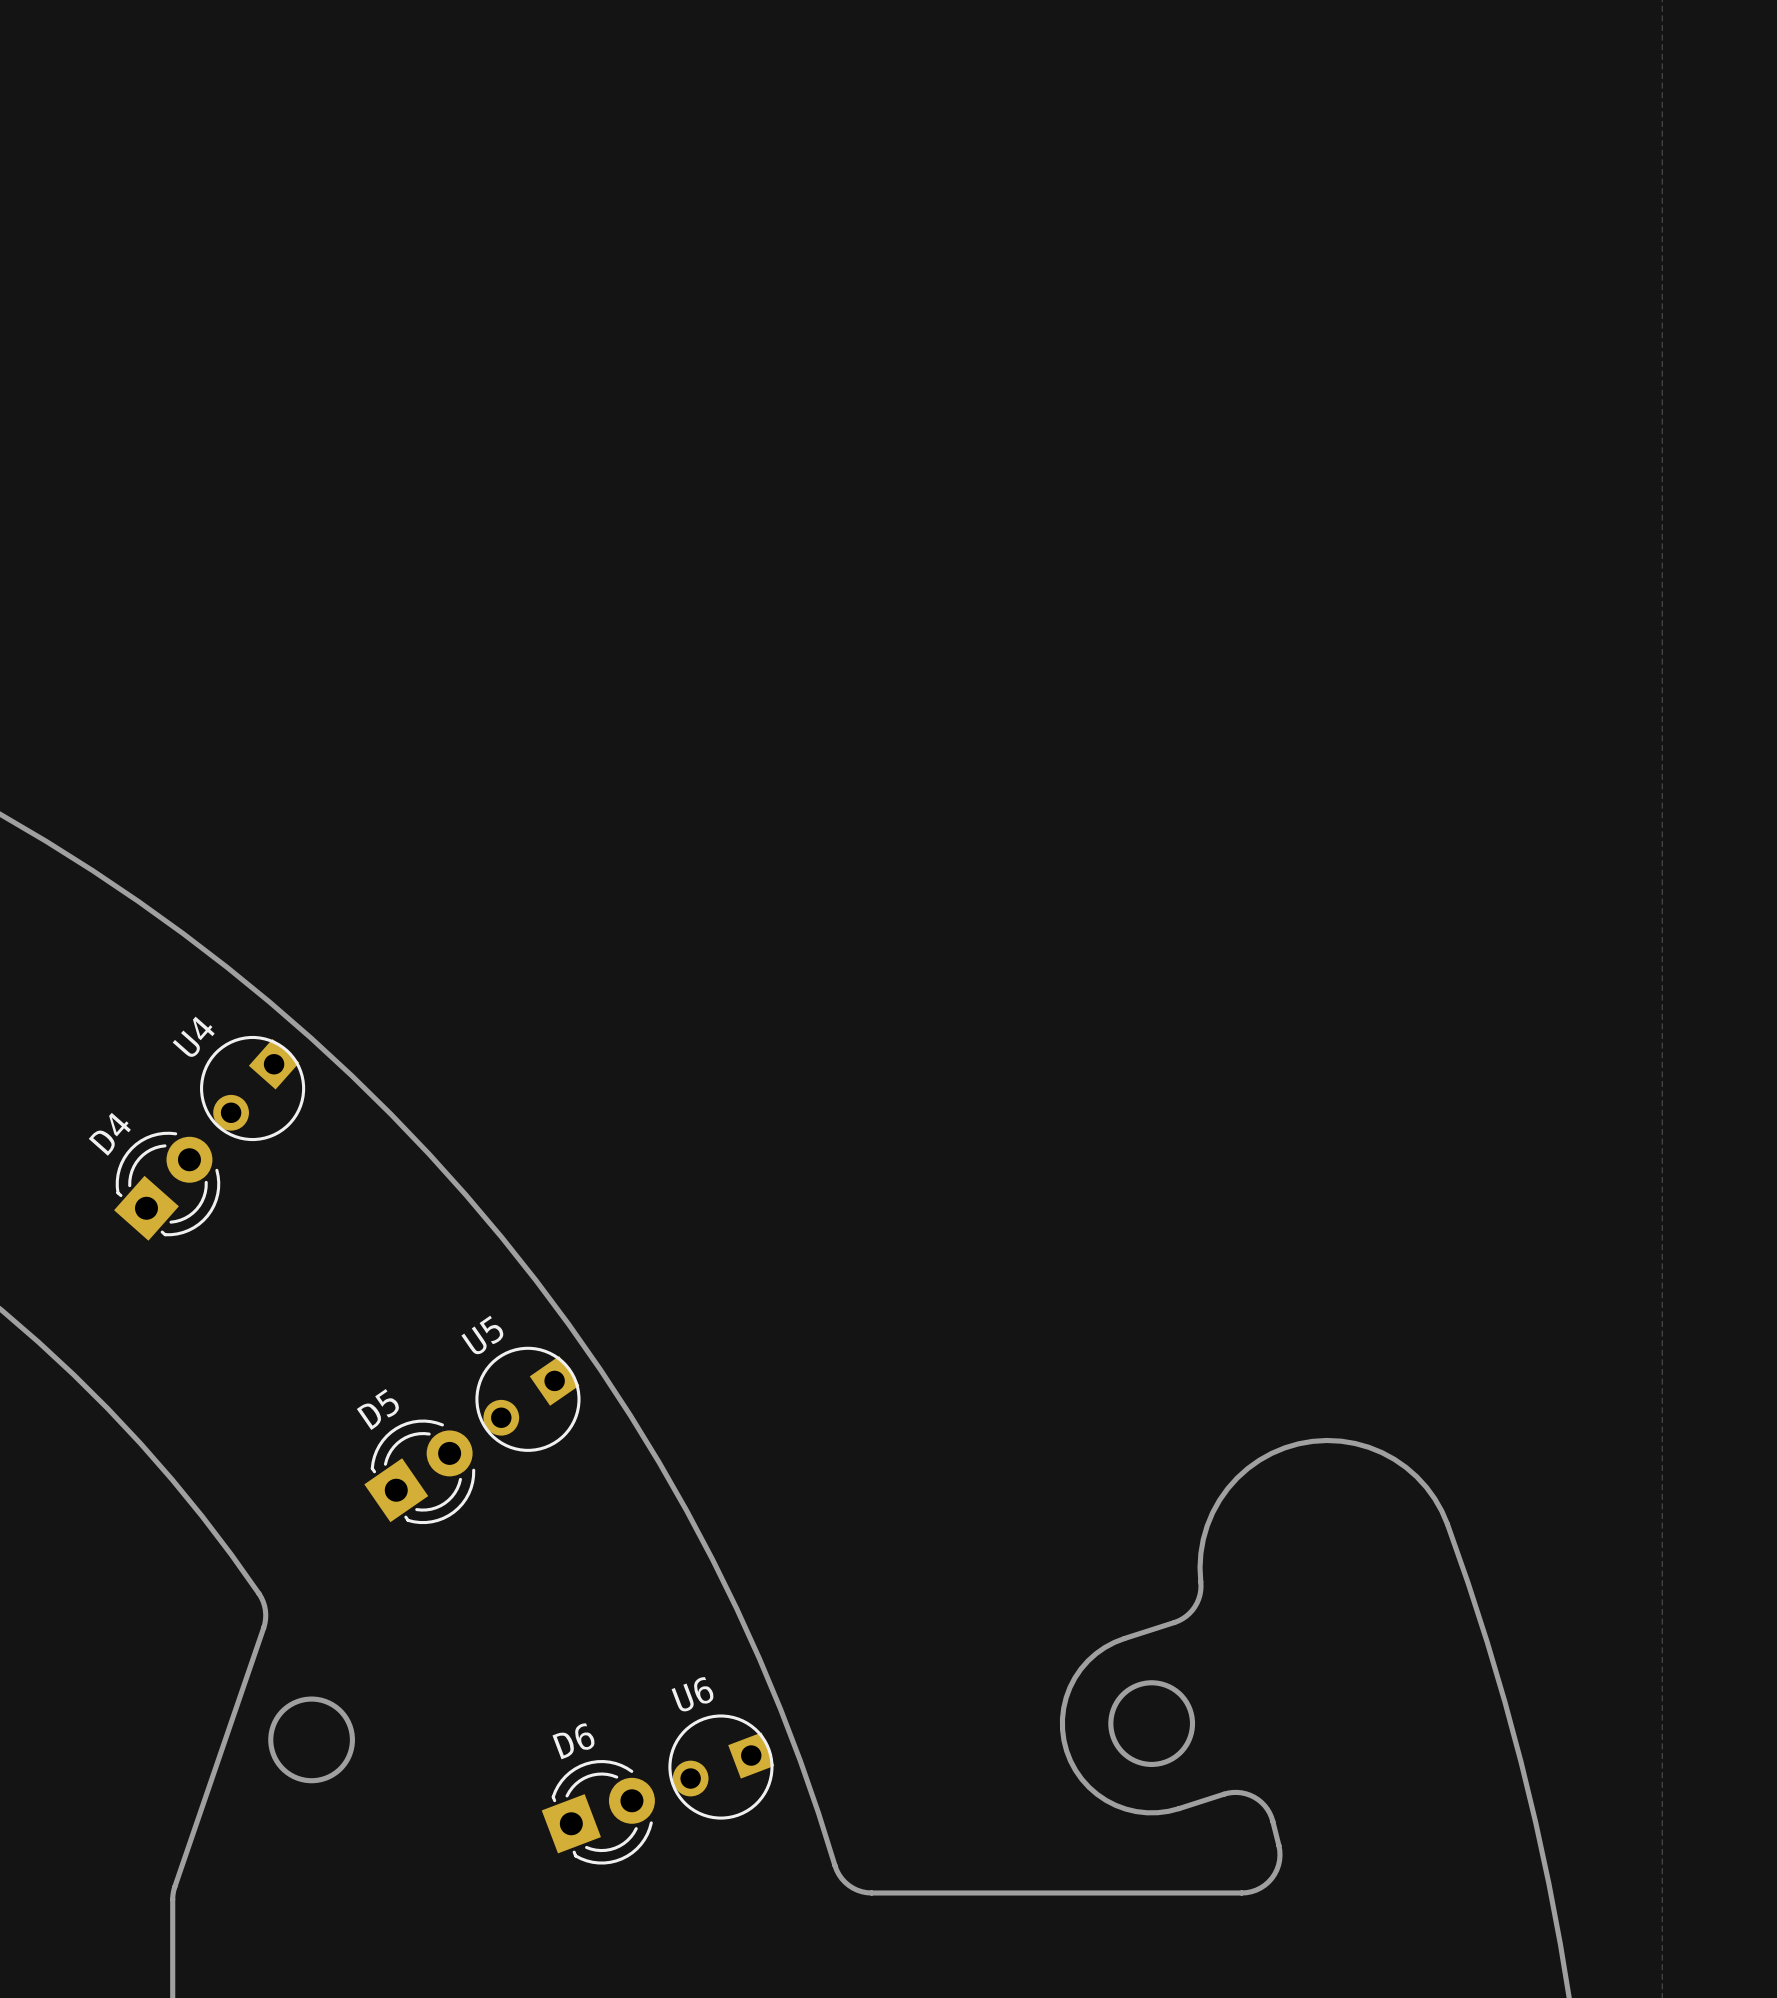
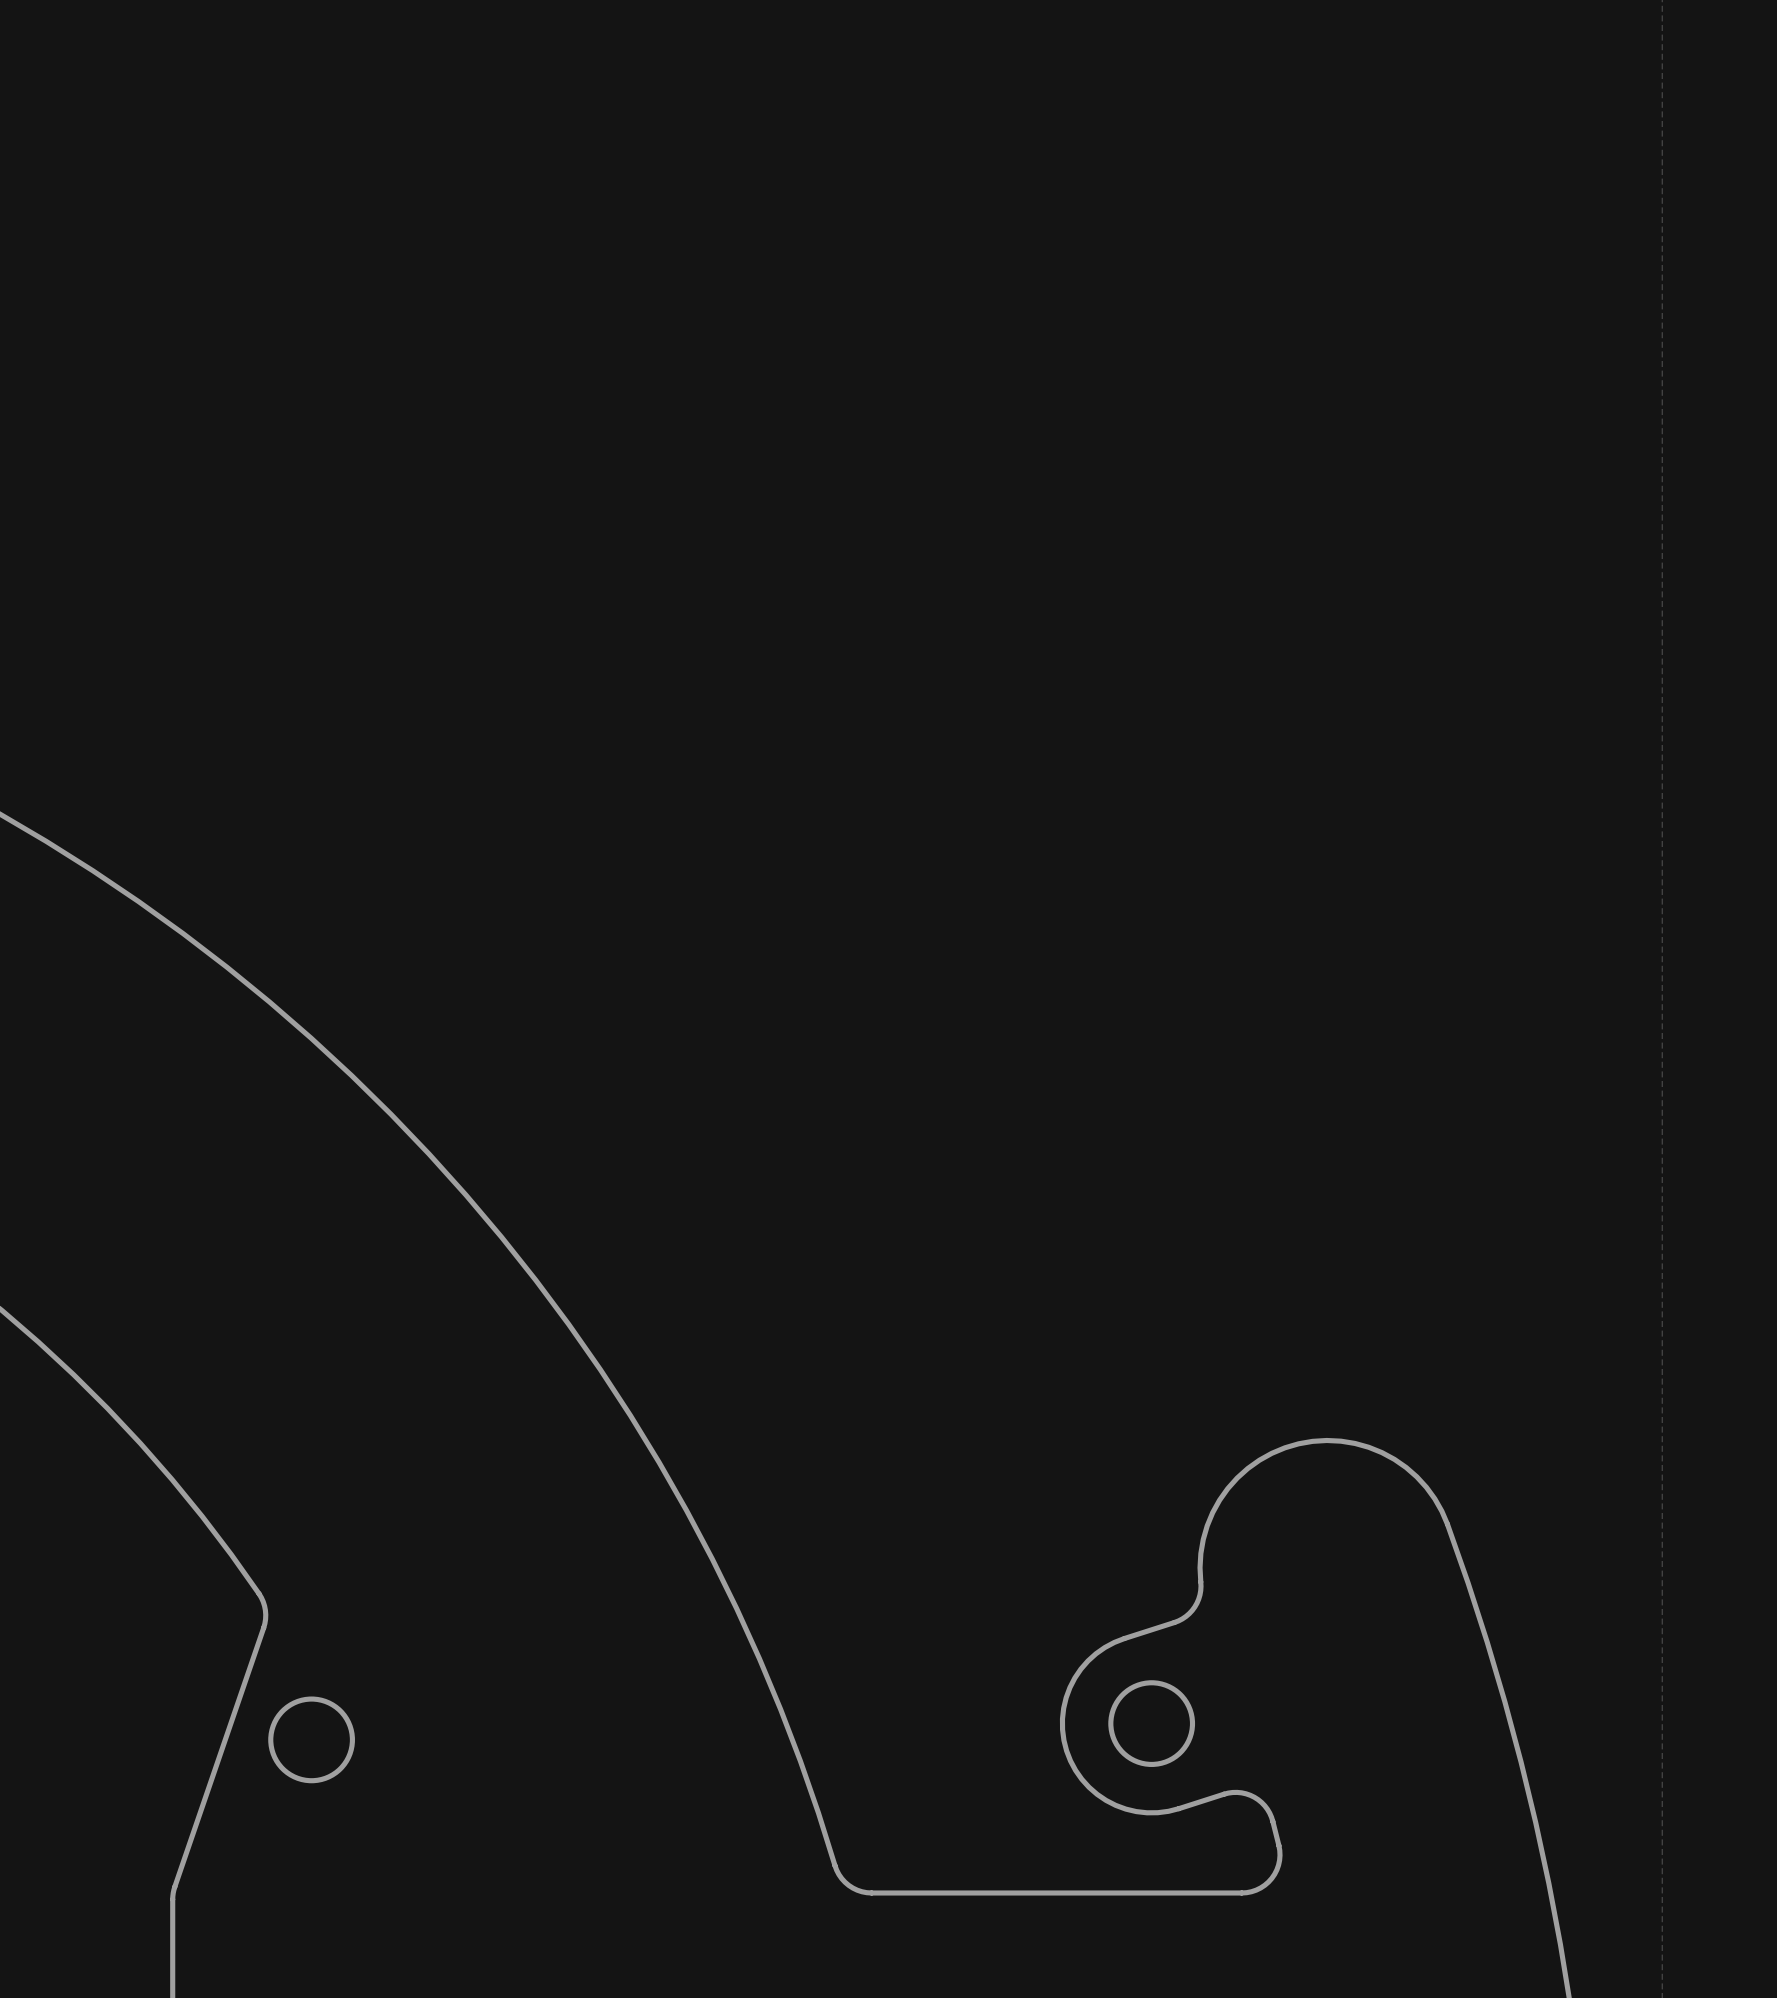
U4: (252, 1088) -> none
D4: (167, 1186) -> none
U5: (527, 1399) -> none
D5: (419, 1471) -> none
U6: (721, 1767) -> none
D6: (598, 1812) -> none

